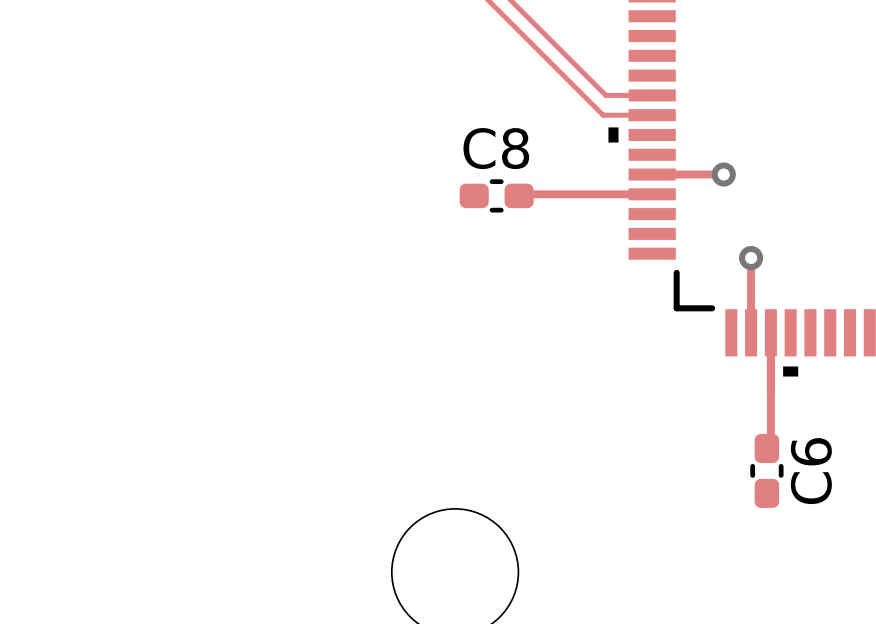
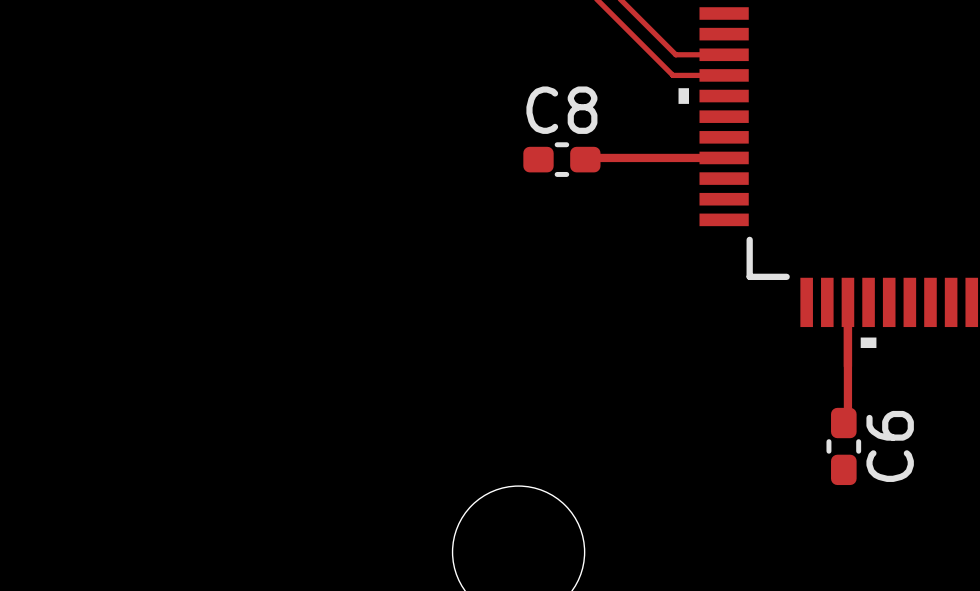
top track: (652, 174) (723, 174) -> none
via: (723, 174) -> none
top track: (751, 258) (751, 332) -> none
via: (751, 258) -> none

